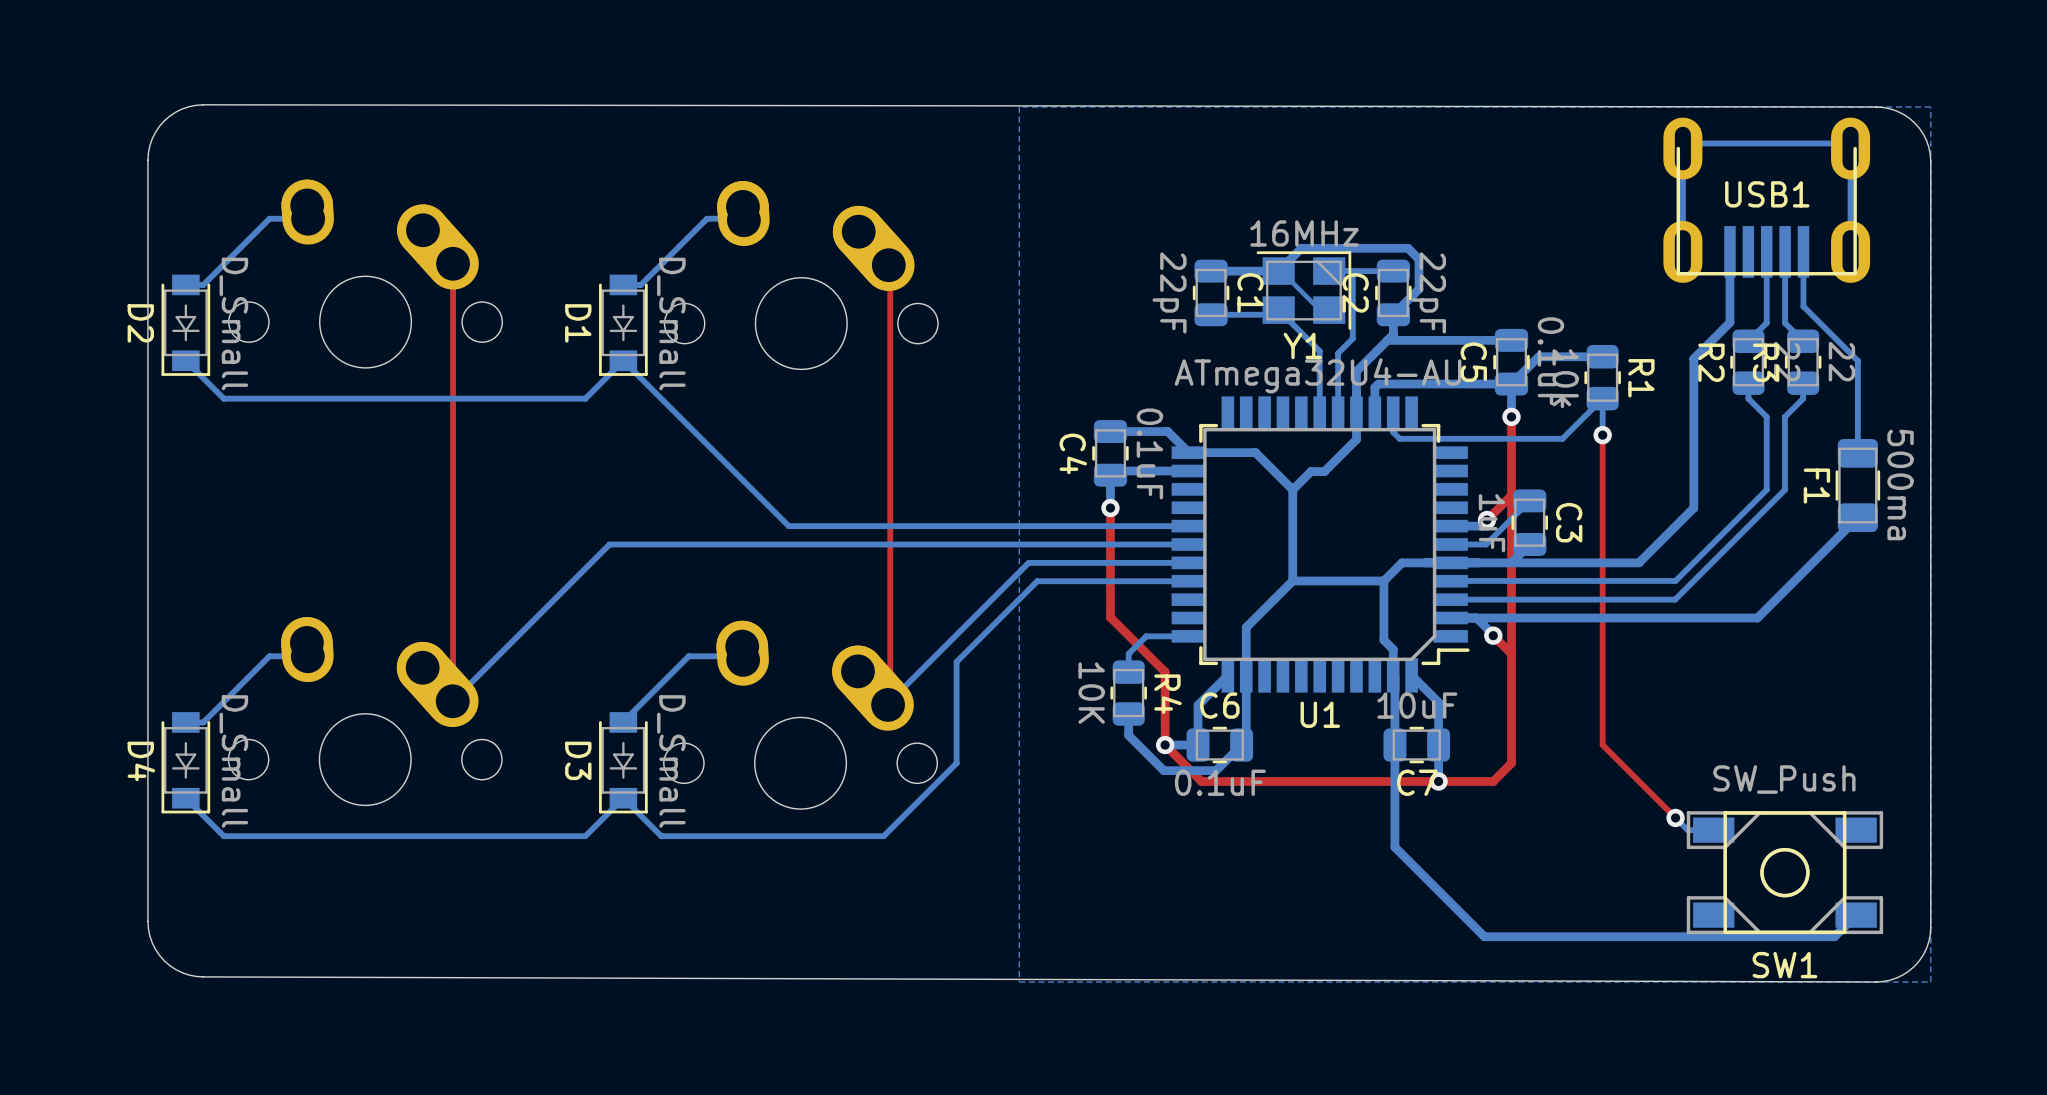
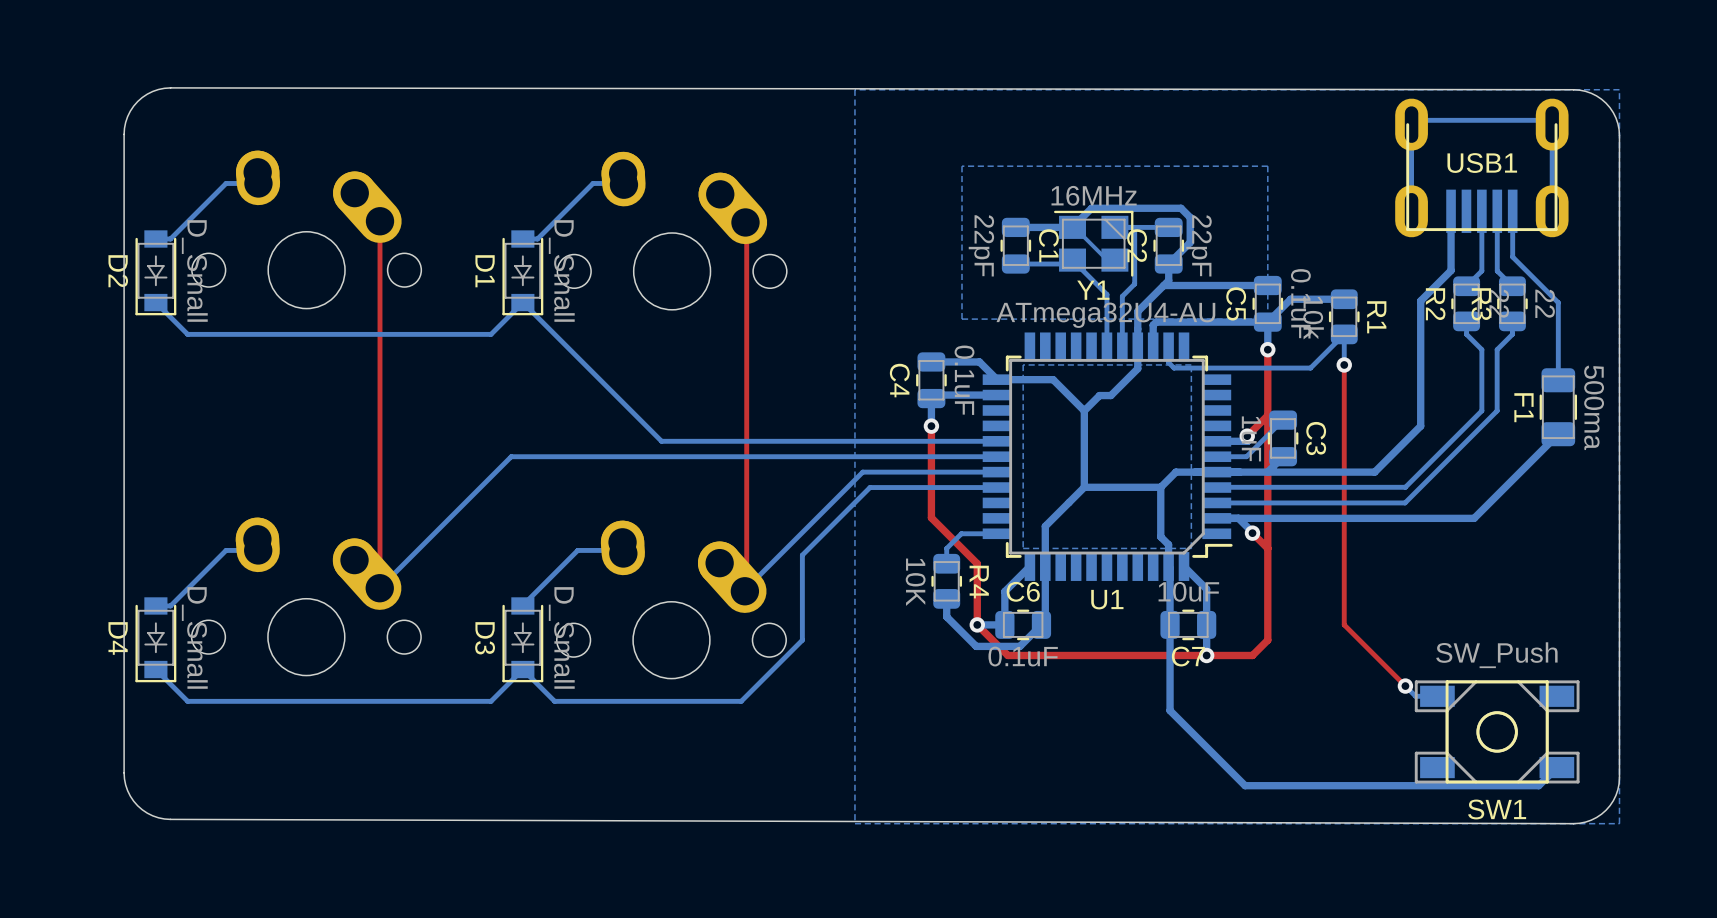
bottom zone outline: none -> (1267, 166) (1267, 319) (962, 319) (962, 166) (1267, 166)
bottom zone outline: none -> (1191, 364) (1191, 548) (1023, 548) (1023, 364) (1191, 364)

